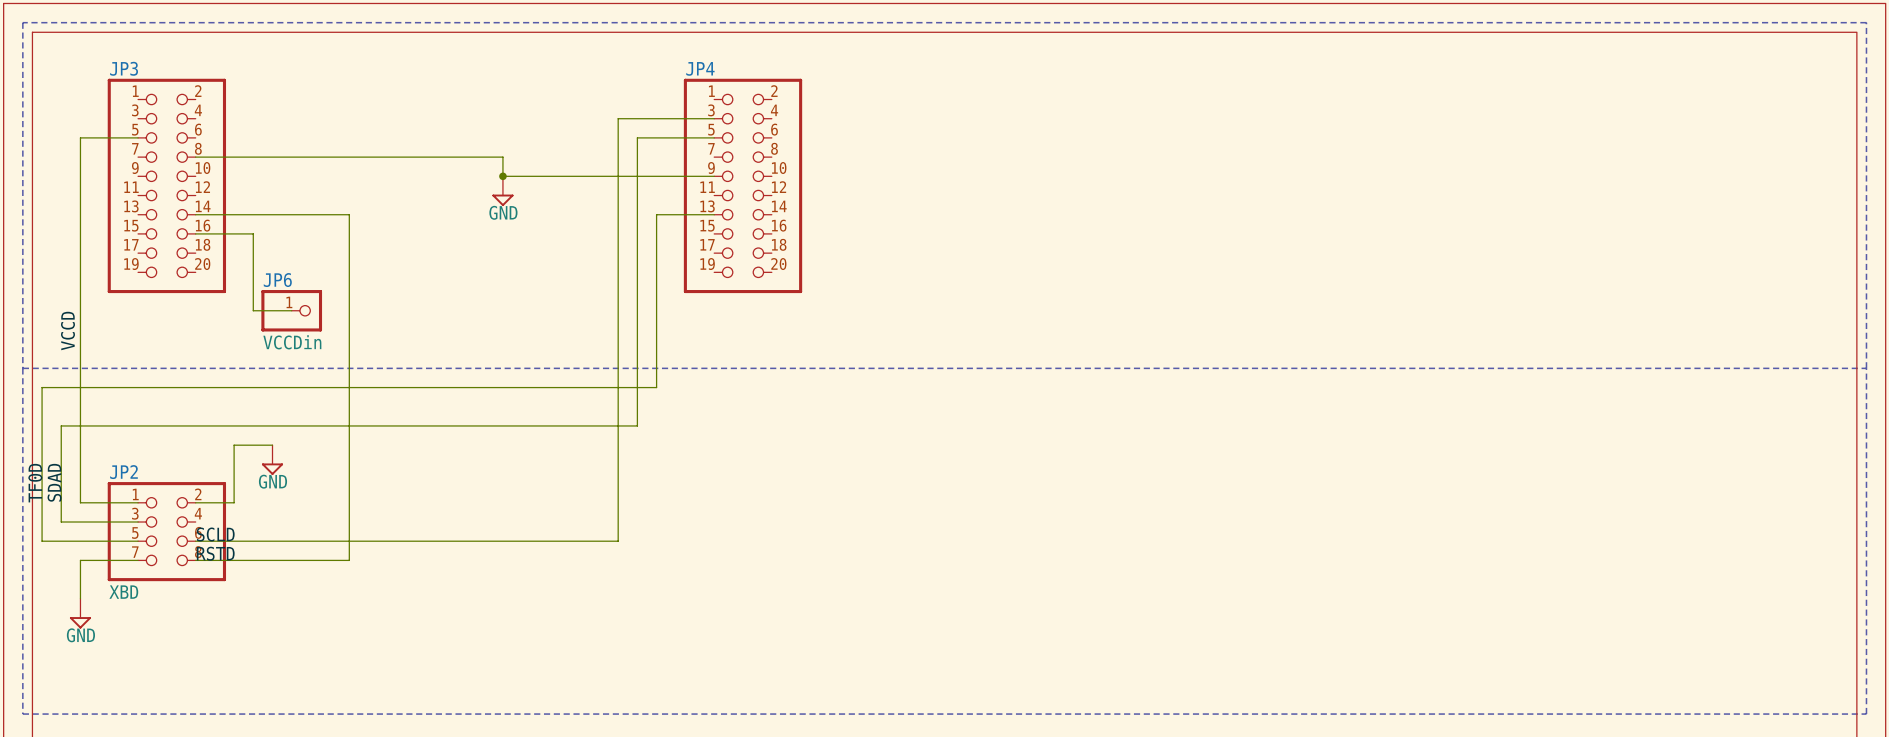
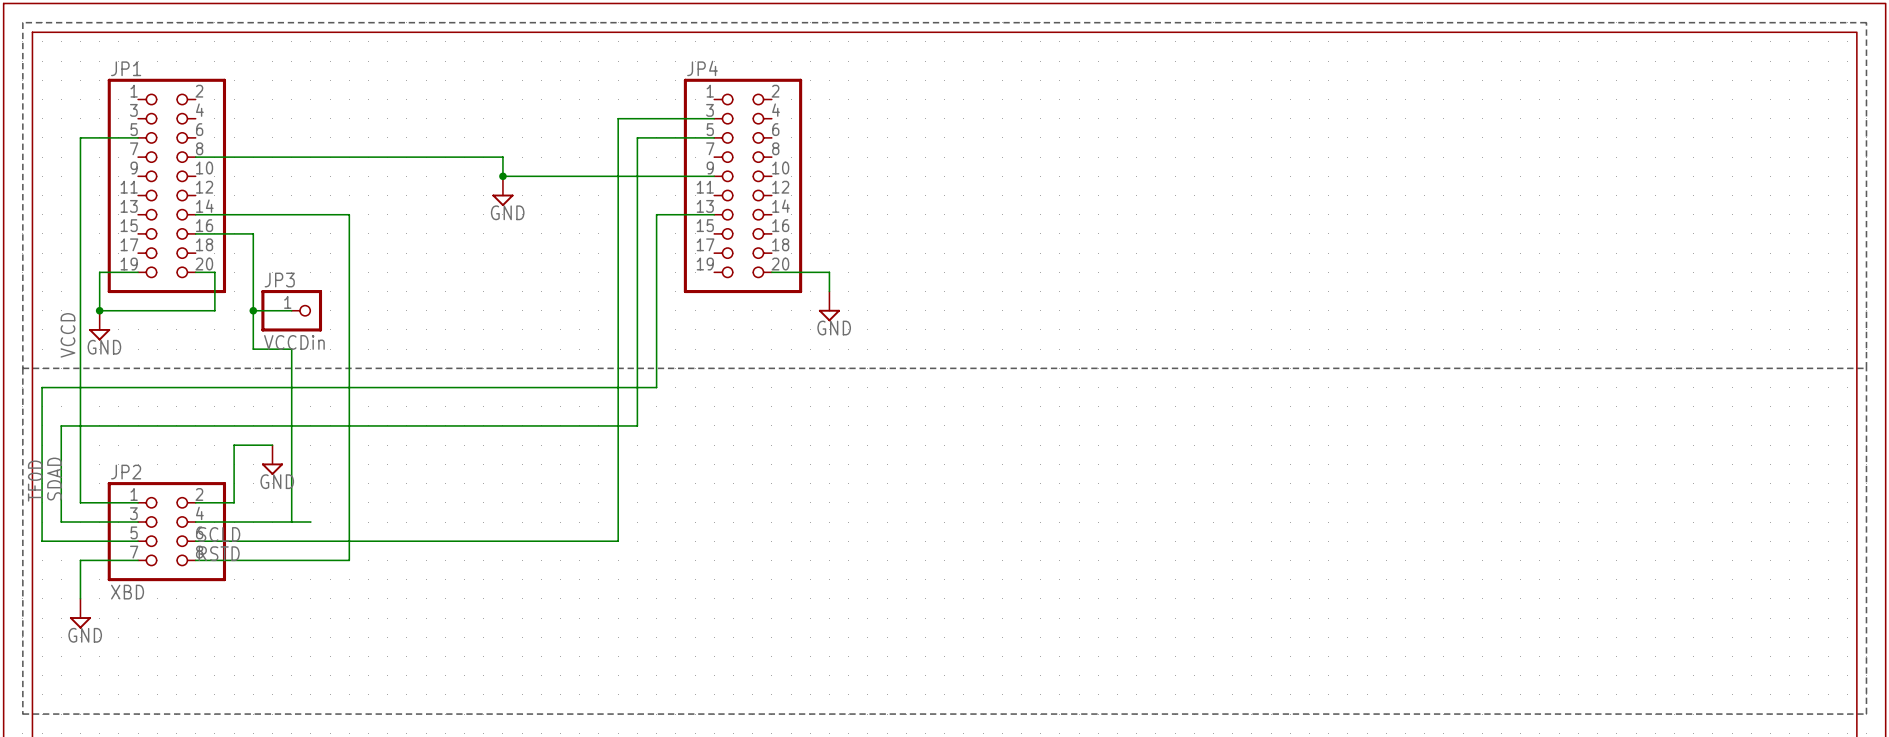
JP3 name: JP3 (124, 68) -> JP1 (126, 68)
wire: none -> (138, 272) (99, 272) (99, 310) (214, 310) (214, 272) (195, 272)
wire: none -> (771, 272) (829, 272) (829, 291)
JP6 name: JP6 (277, 280) -> JP3 (279, 280)
power symbol: none -> GND (829, 306)
junction: none -> (99, 310)
wire: none -> (253, 310) (253, 349) (291, 349) (291, 522)
junction: none -> (253, 310)
power symbol: none -> GND (99, 325)
wire: none -> (195, 522) (310, 522)

